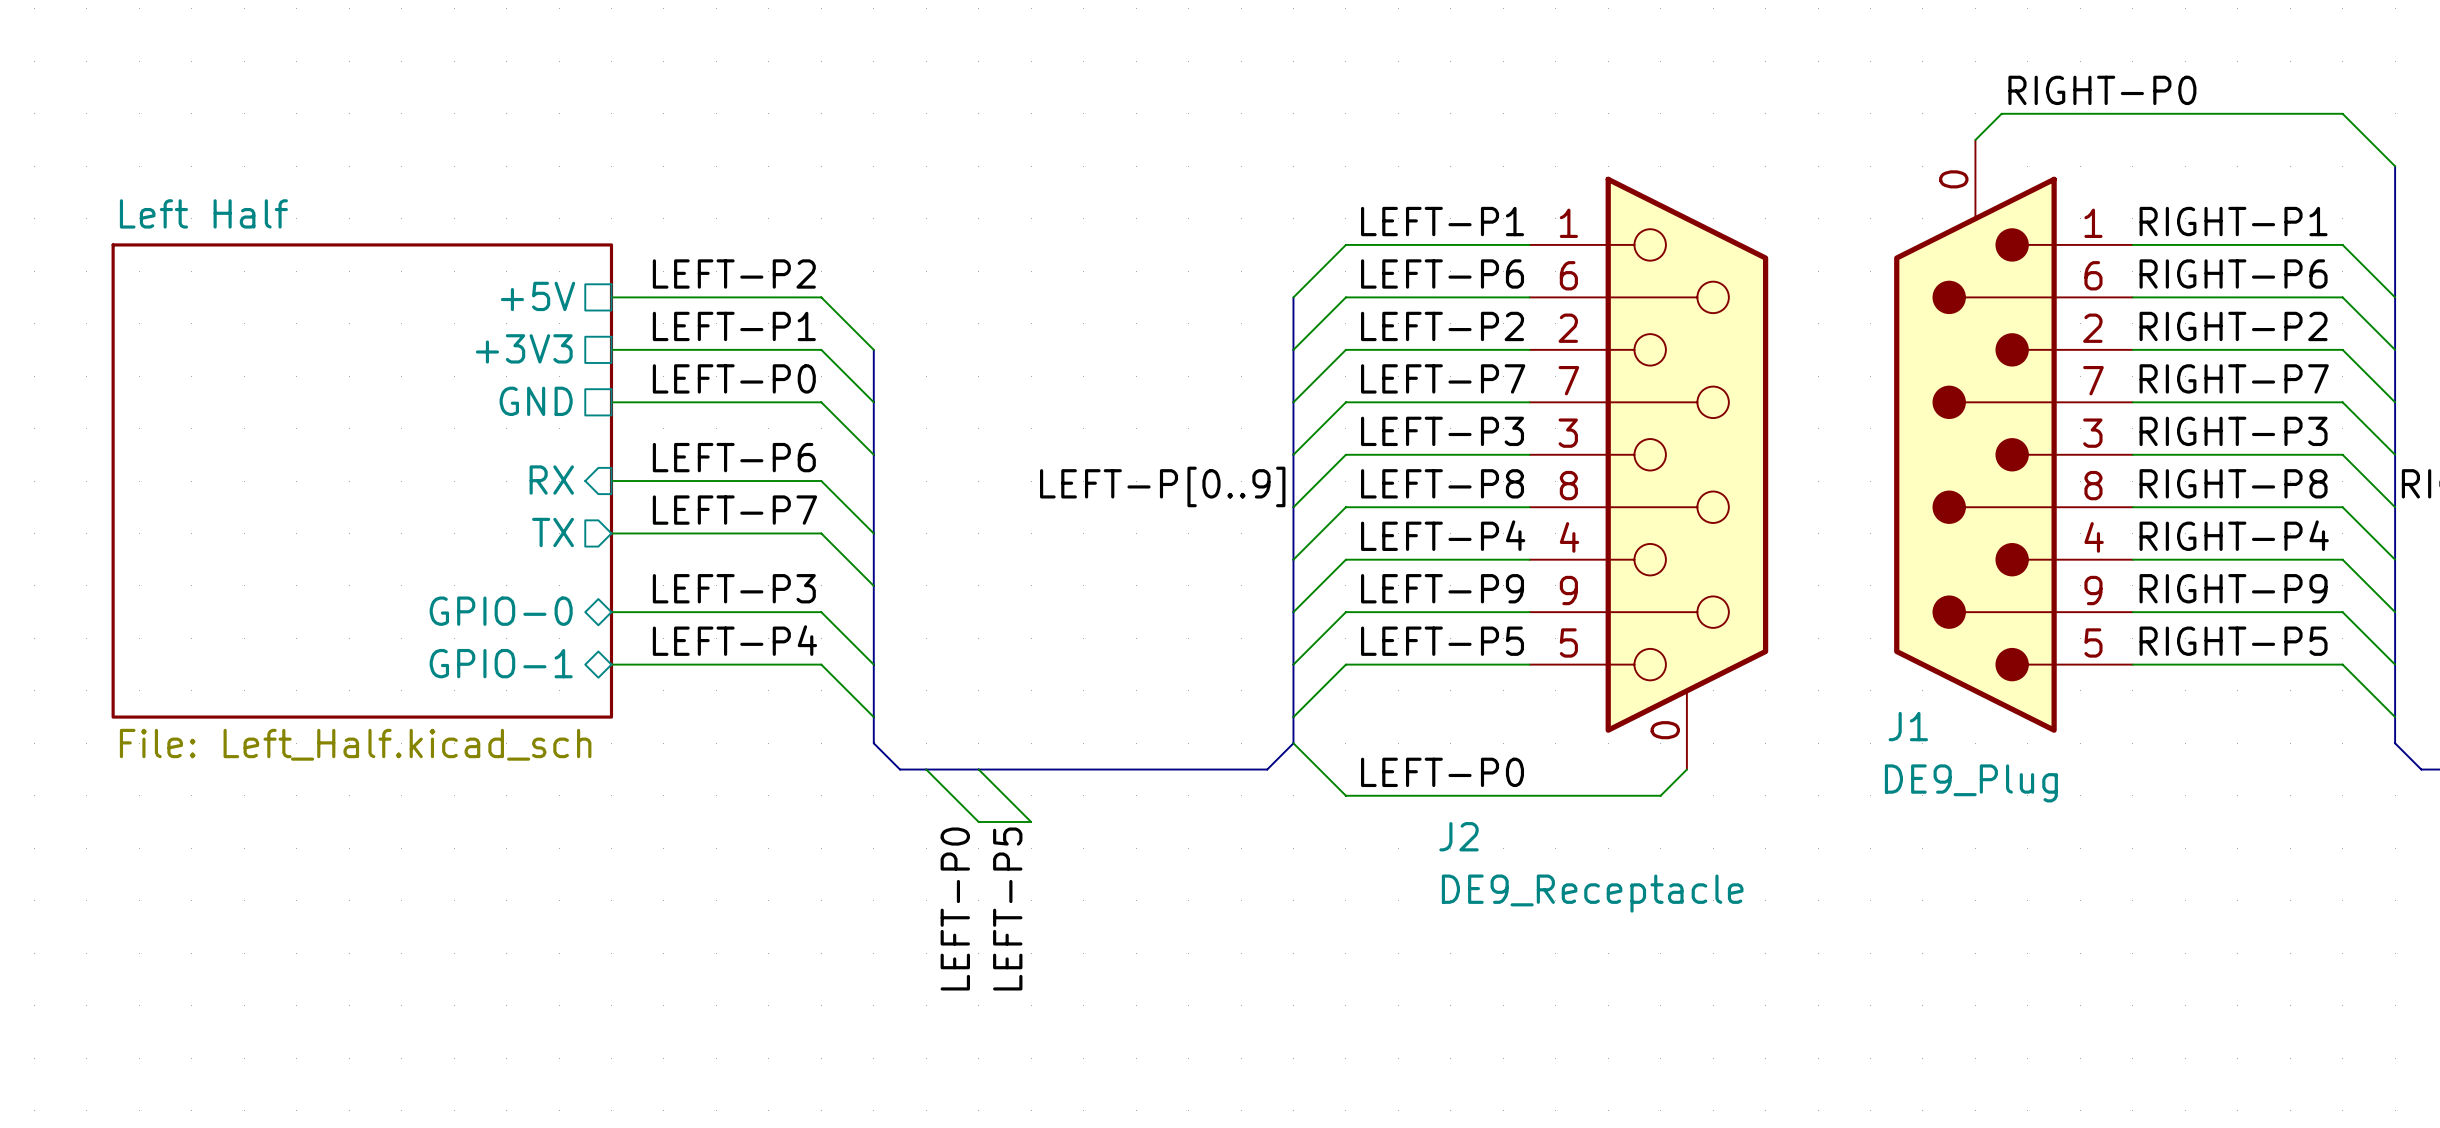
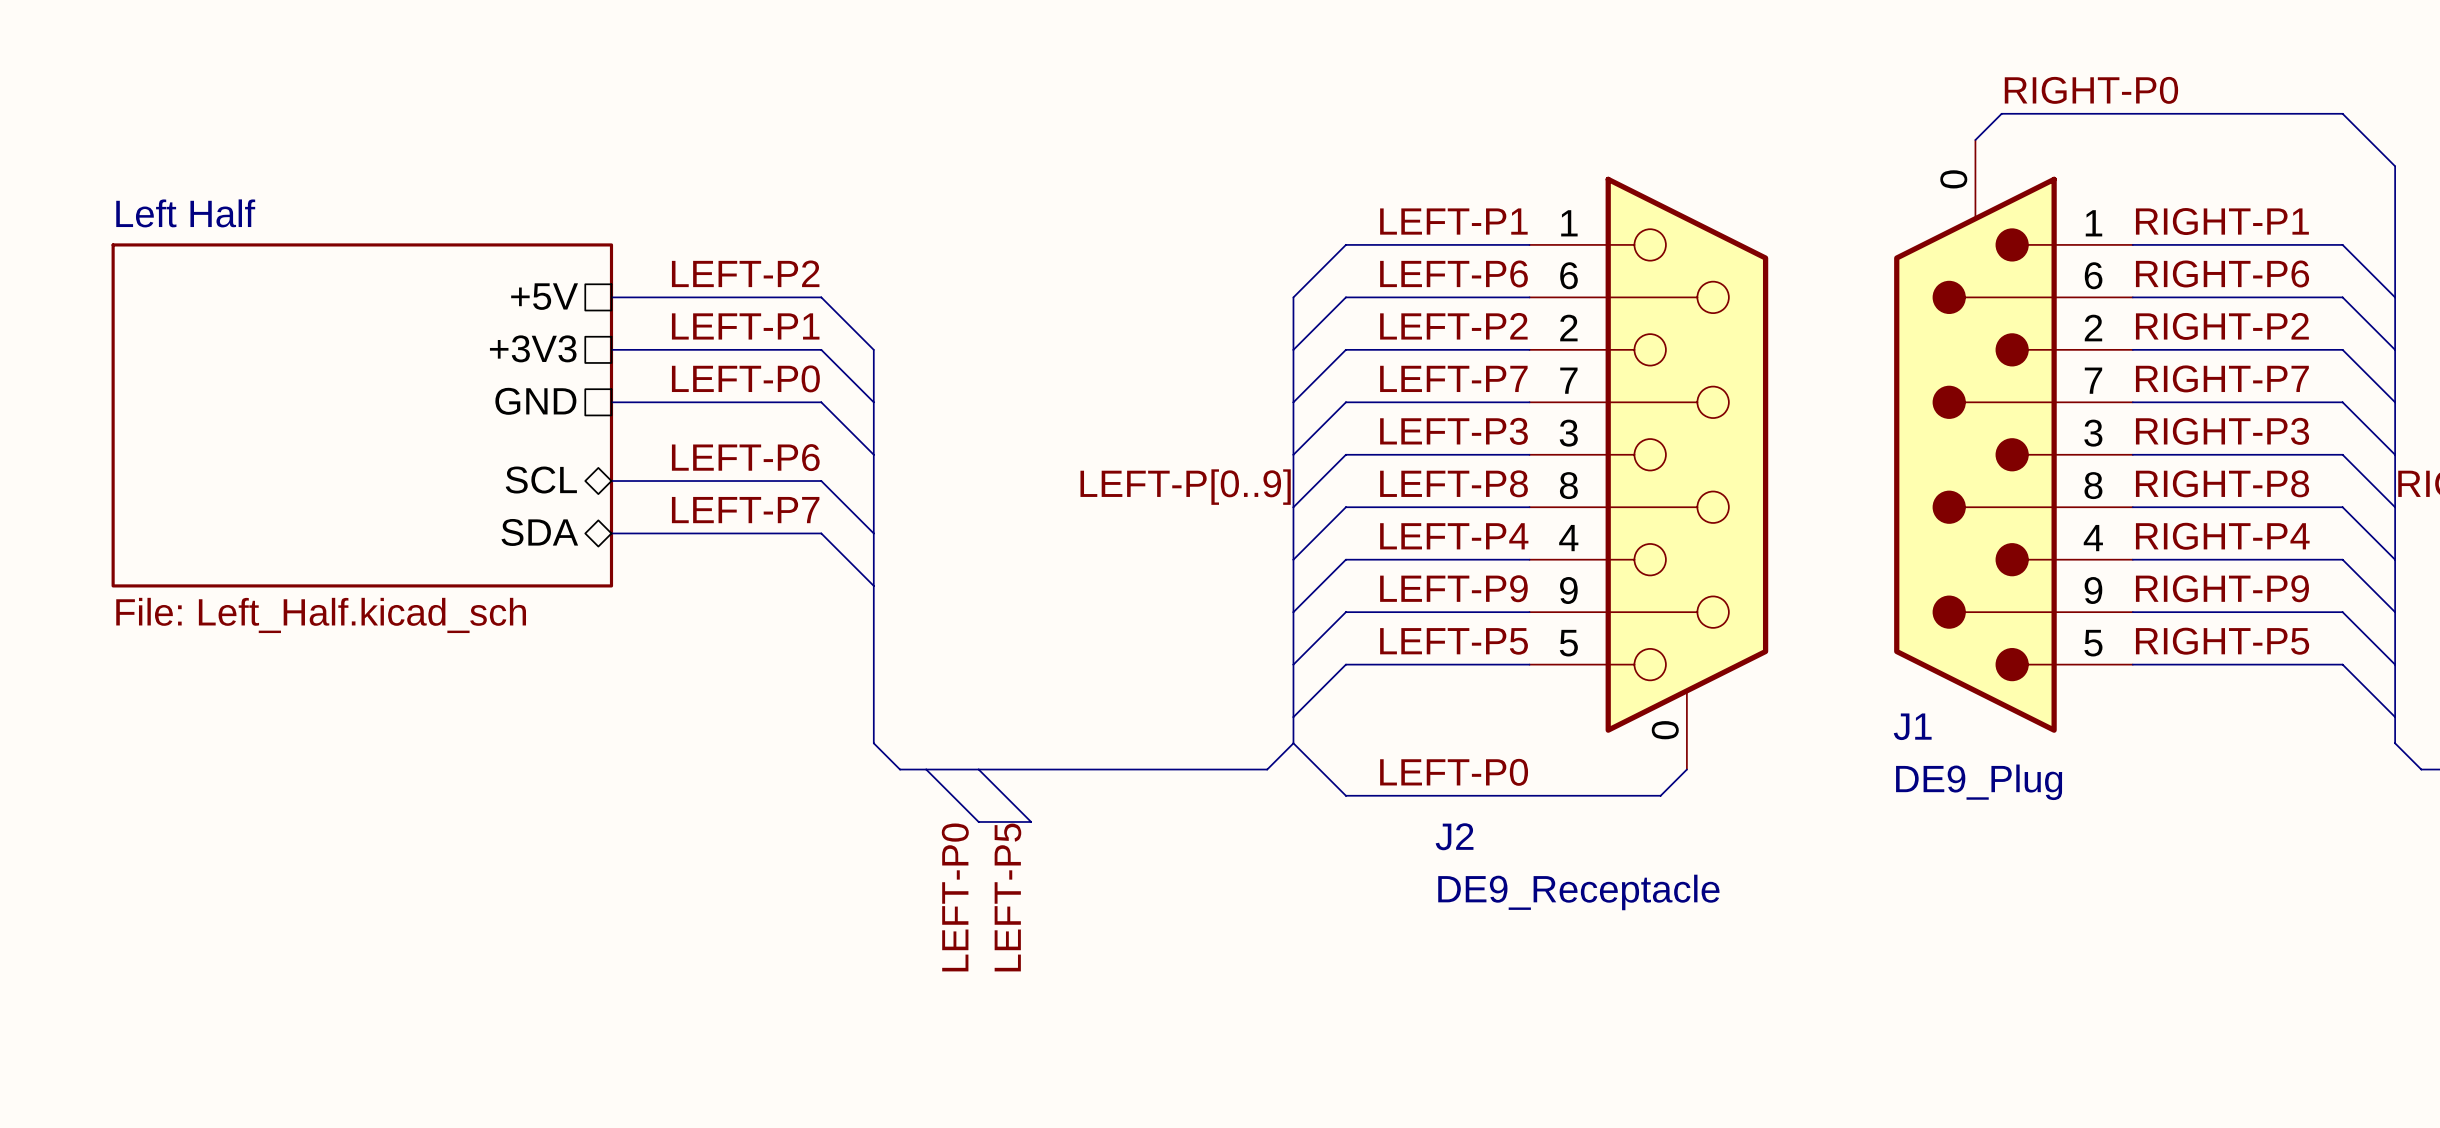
sheet Left Half: none -> File: Left_Half.kicad_sch (362, 415)
sheet pin shape: input (551, 480) -> bidirectional (541, 480)
sheet pin: RX (551, 480) -> SCL (541, 480)
sheet Left Half: File: Left_Half.kicad_sch (362, 481) -> none
sheet pin shape: output (553, 532) -> bidirectional (539, 532)
sheet pin: TX (553, 532) -> SDA (539, 532)
label: LEFT-P3 (734, 588) -> none
sheet pin: GPIO-0 (501, 611) -> none
wire: (611, 612) (821, 612) (873, 664) -> none
label: LEFT-P4 (734, 640) -> none
sheet pin: GPIO-1 (501, 663) -> none
wire: (611, 664) (821, 664) (873, 717) -> none

